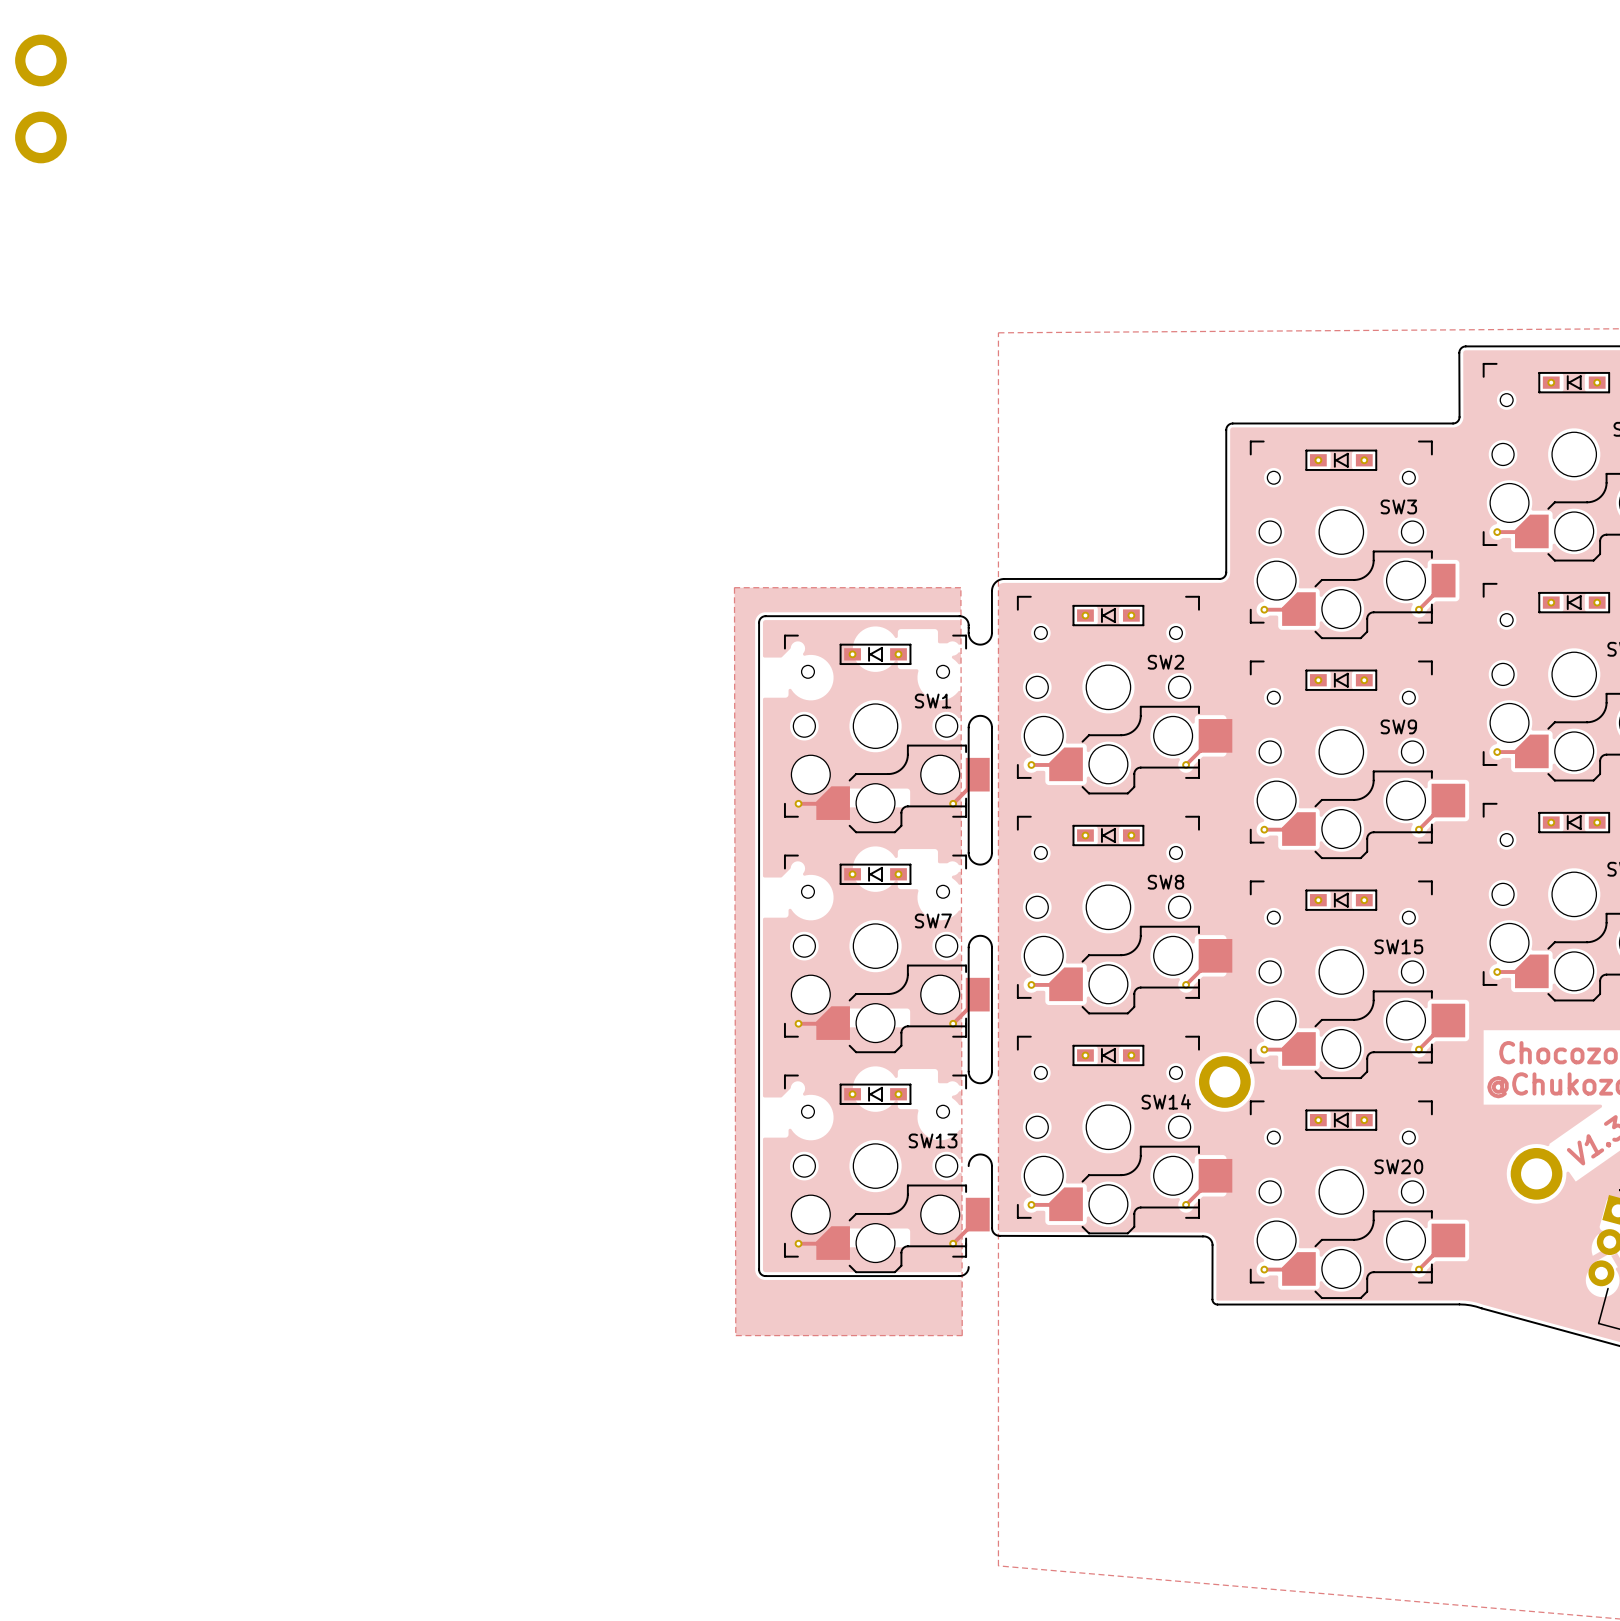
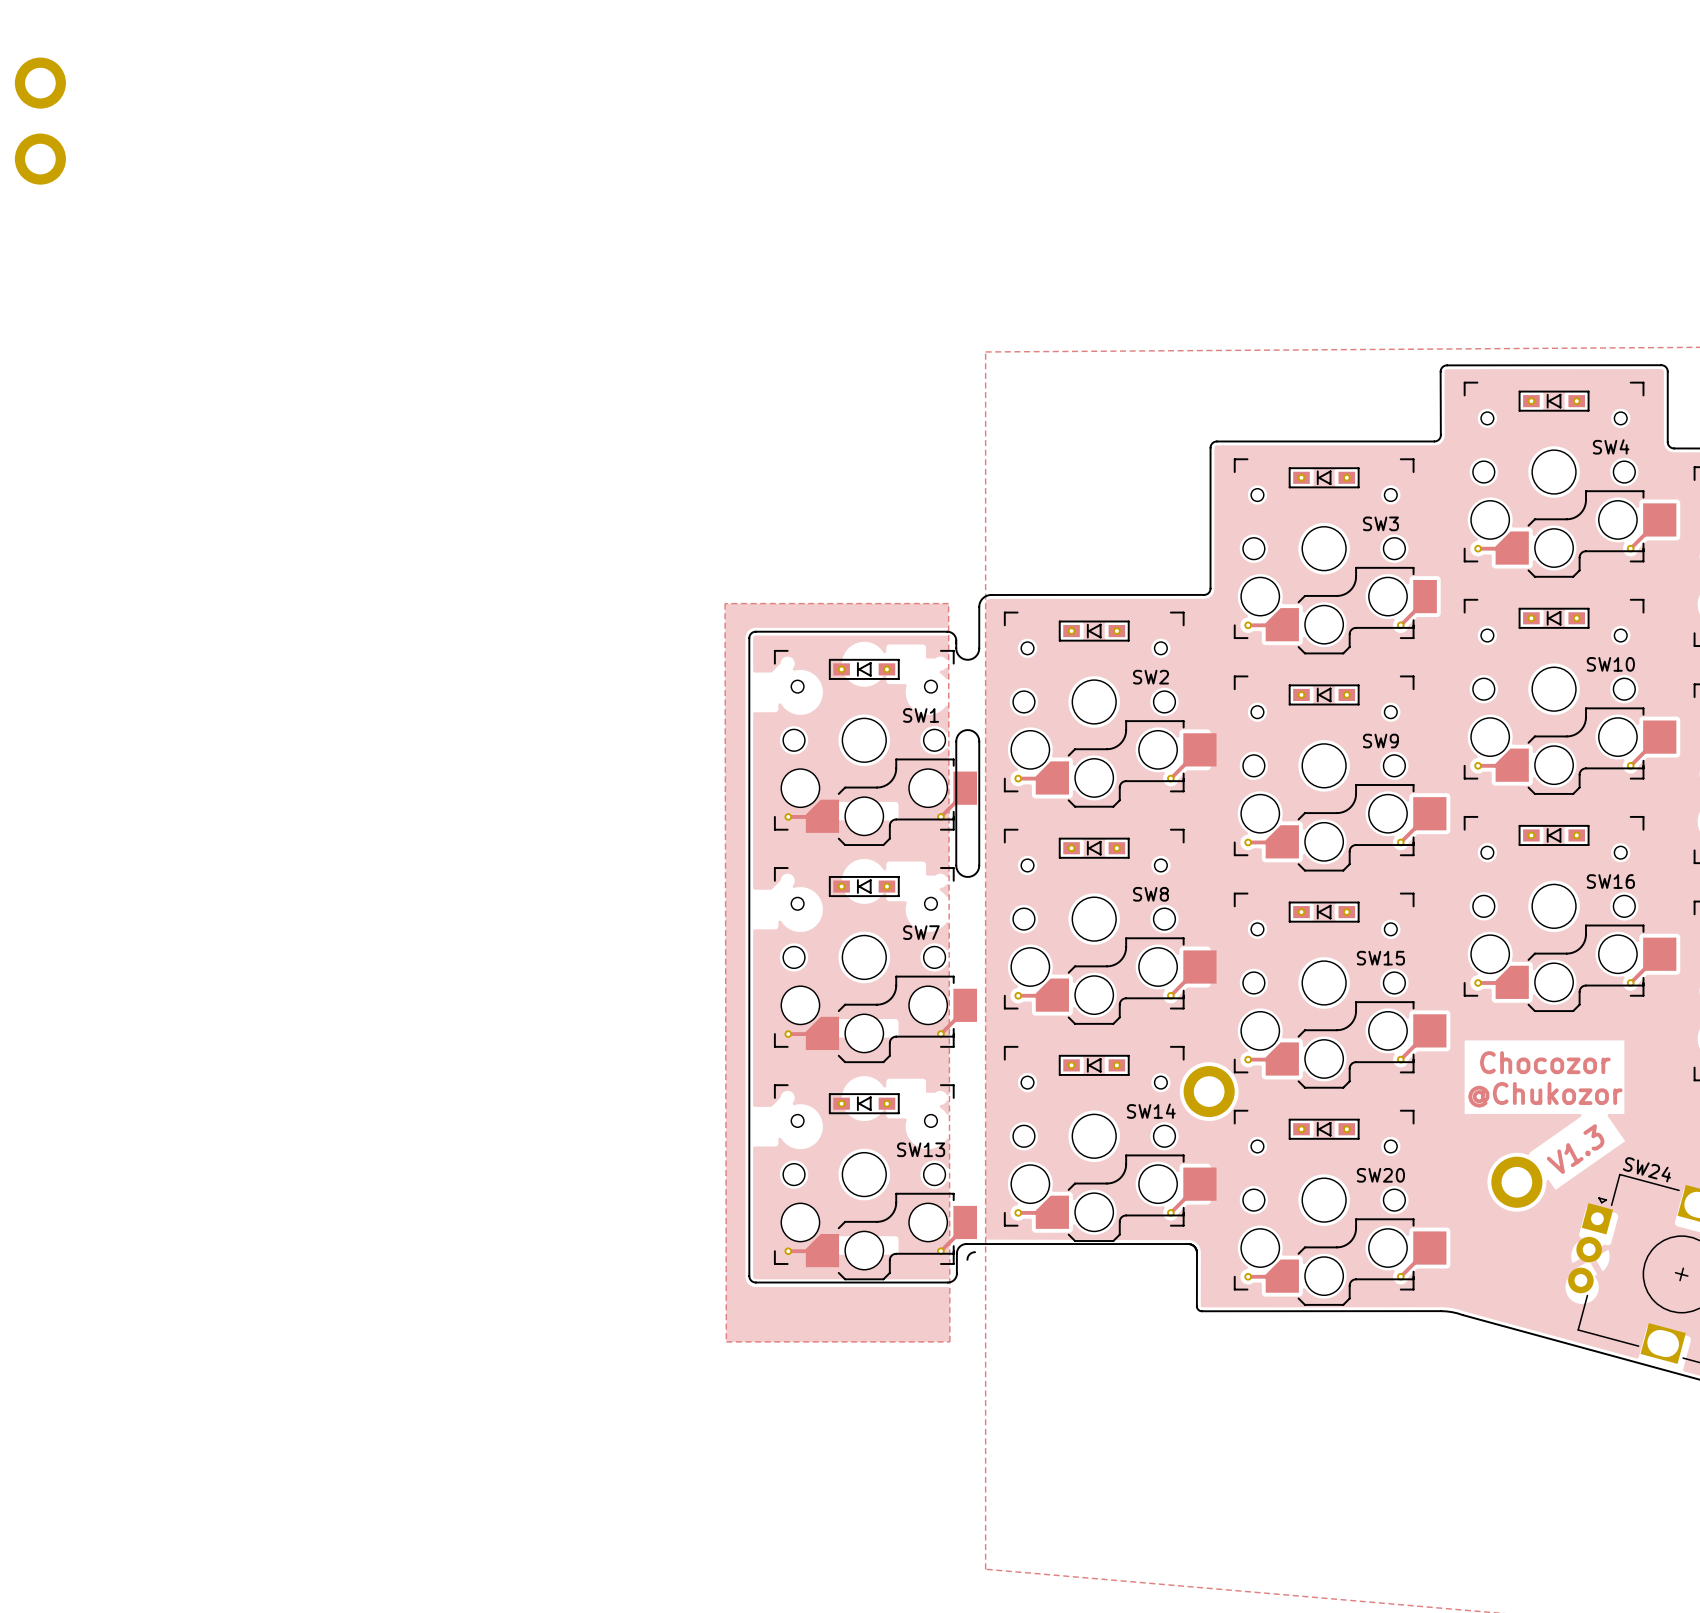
board edge: (968, 947) (968, 1073) (972, 1080) (981, 1083) (989, 1079) (991, 1073) (991, 946) (988, 938) (978, 935) (971, 939) (968, 947) -> none
board edge: (968, 1166) (970, 1159) (977, 1154) (985, 1155) (991, 1161) (992, 1229) (997, 1235) (1202, 1236) -> none
board edge: none -> (975, 1252) (969, 1254) (967, 1259)
board edge: (968, 1267) (966, 1273) (959, 1276) (765, 1276) (760, 1274) (759, 1268) -> (1197, 1252) (1194, 1246) (1188, 1244) (966, 1244) (961, 1245) (957, 1249) (956, 1275) (953, 1280) (948, 1282) (755, 1282) (751, 1280) (749, 1276)

